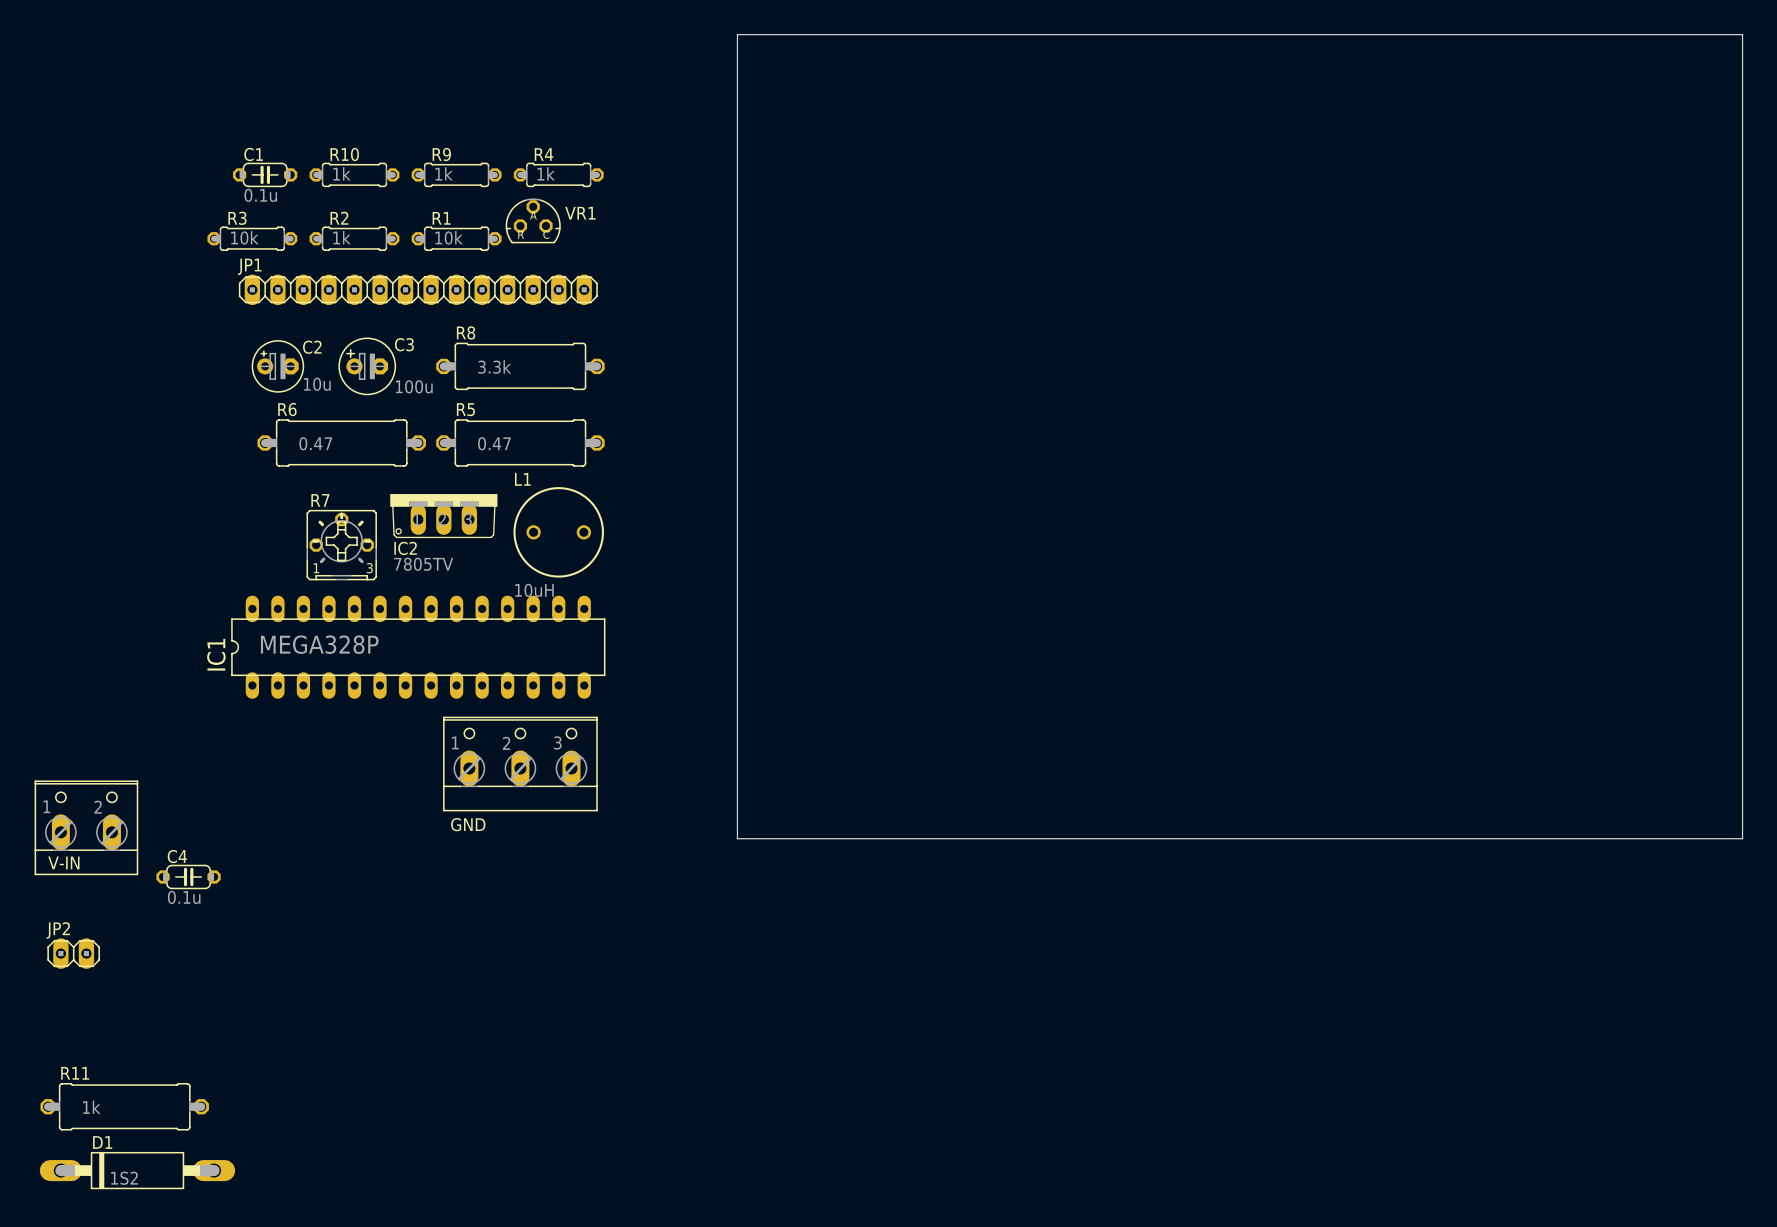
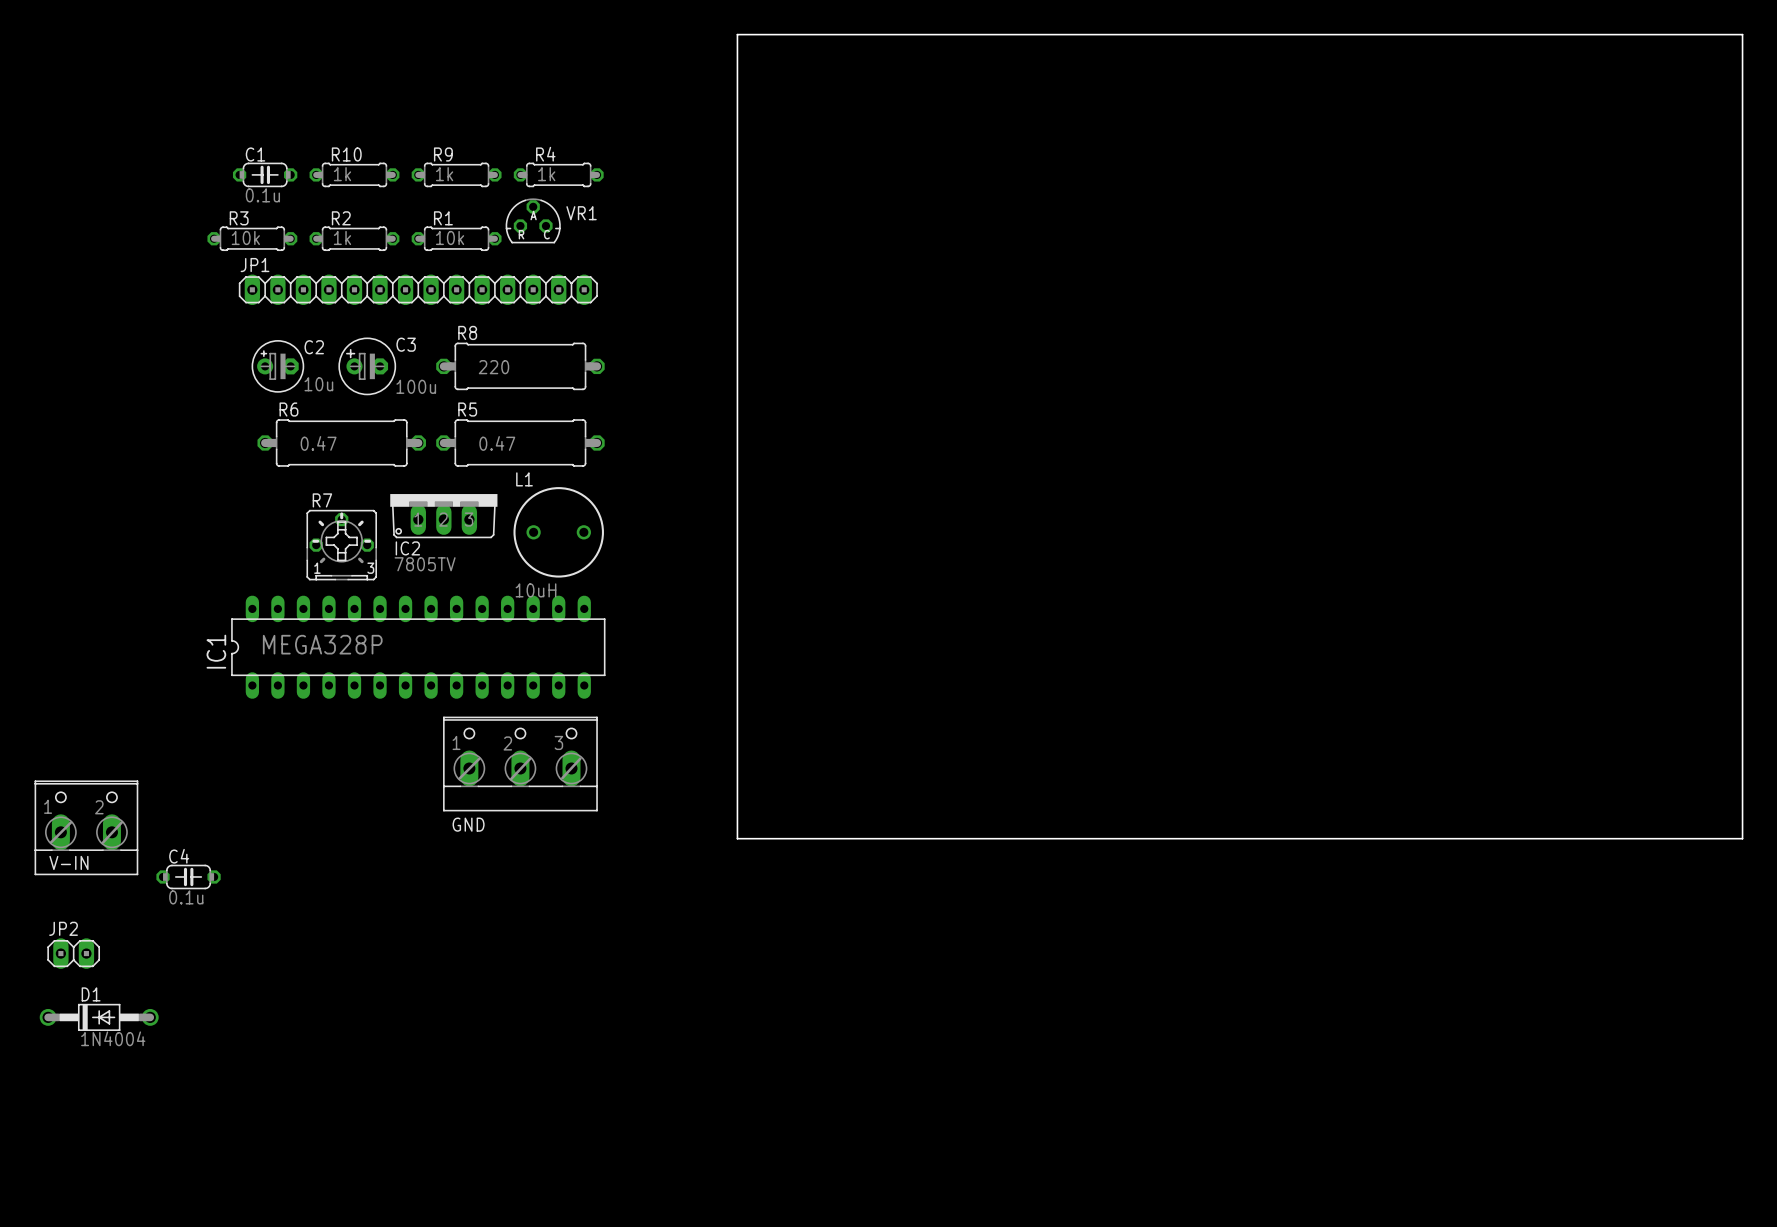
R8 value: 3.3k (494, 367) -> 220 (494, 367)
R11: 1k (124, 1106) -> none
D1 name position: D1 (102, 1142) -> D1 (91, 994)
D1 footprint: [39, 1151, 236, 1190] -> [39, 1003, 159, 1031]
D1 value: 1S2 (124, 1178) -> 1N4004 (113, 1038)

